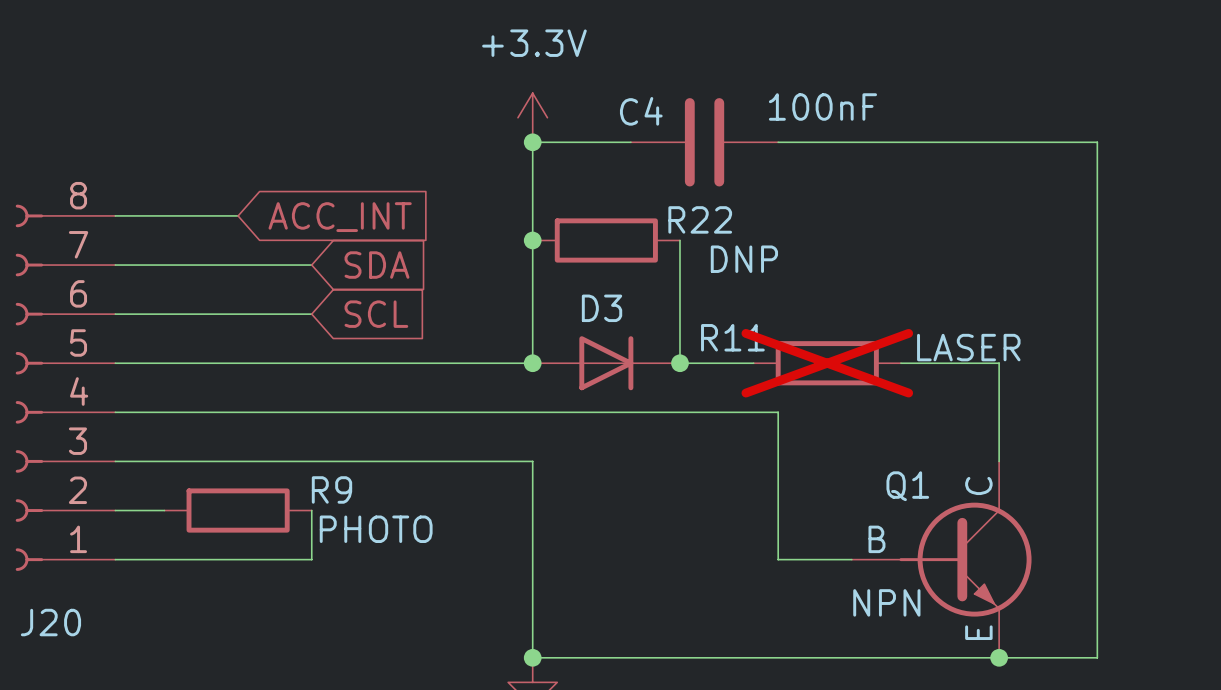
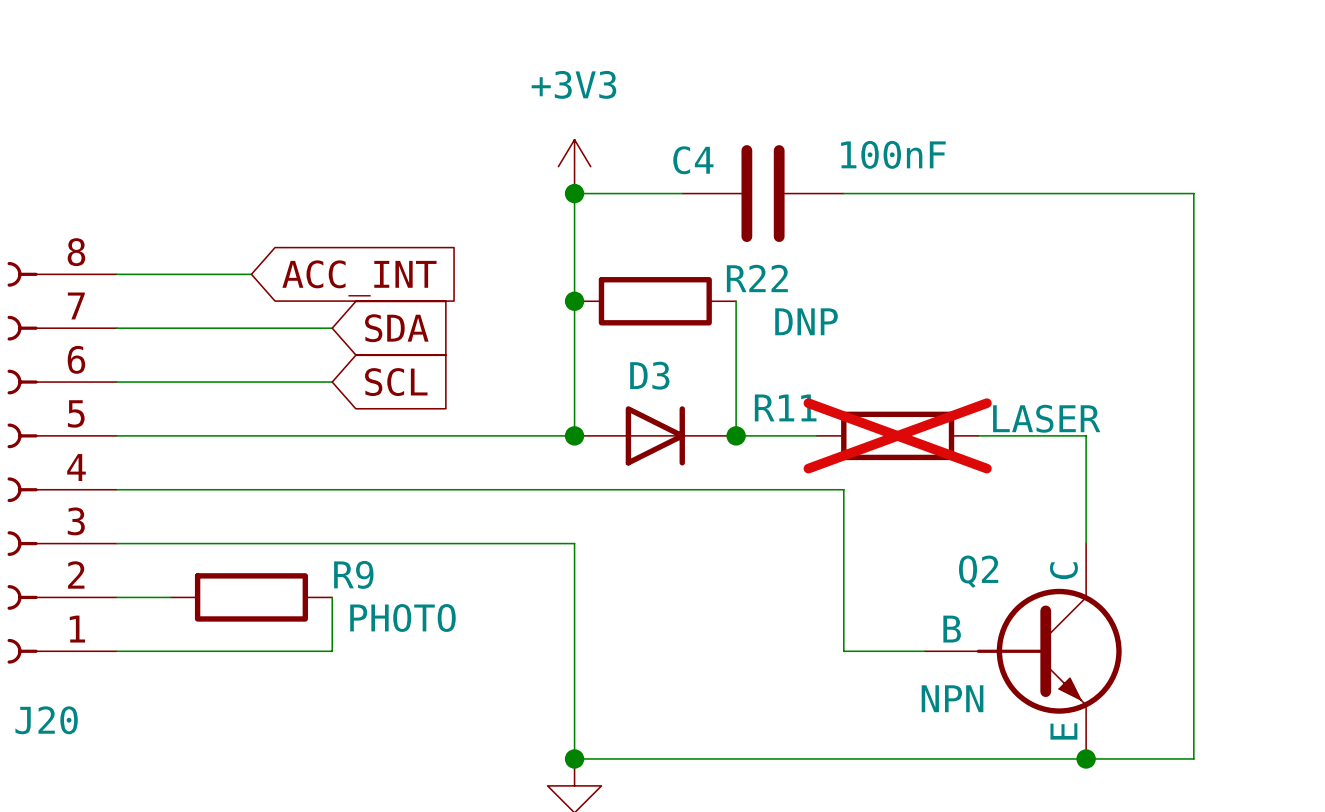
power symbol: +3.3V (532, 117) -> +3V3 (574, 166)
Q1 name: Q1 (907, 486) -> Q2 (978, 571)

